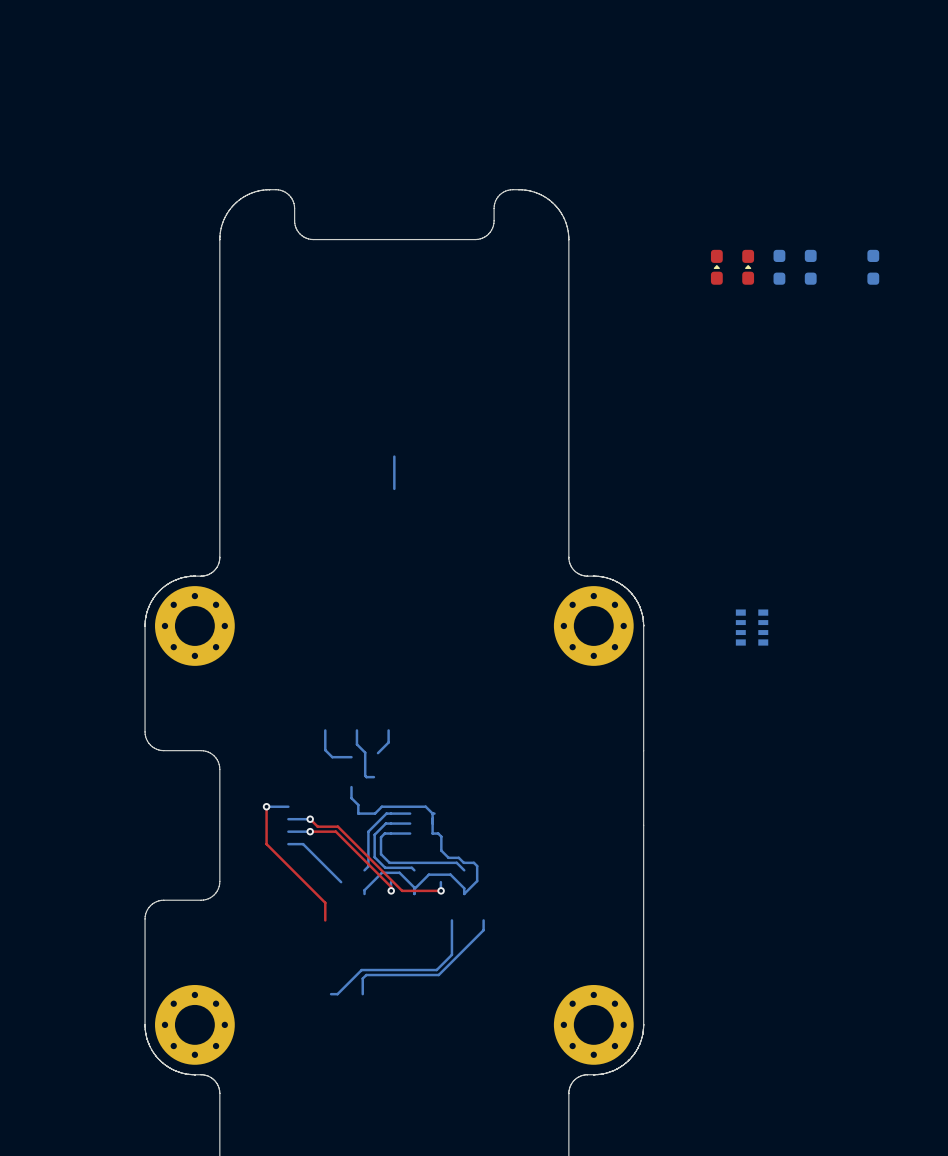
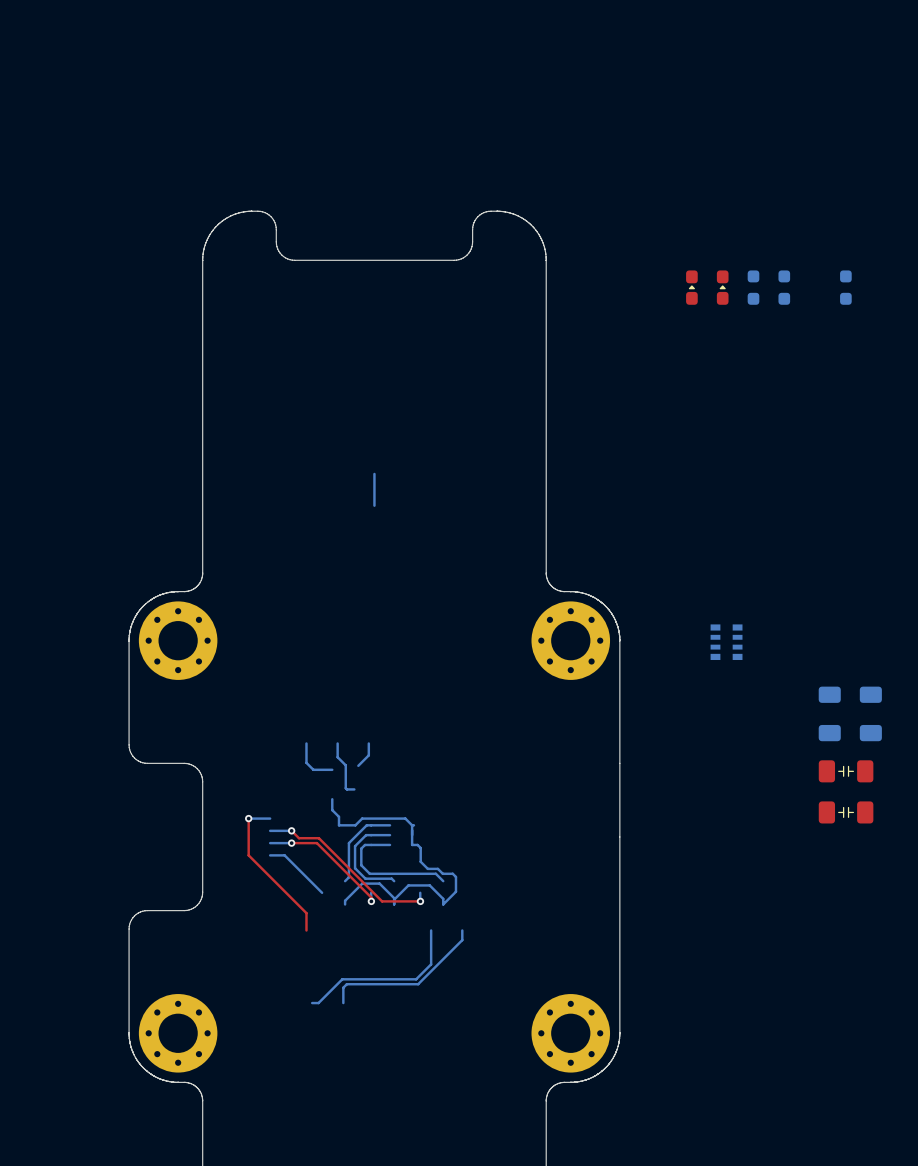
part: none -> (829, 713)
part: none -> (870, 713)
part: none -> (846, 771)
part: none -> (846, 812)

